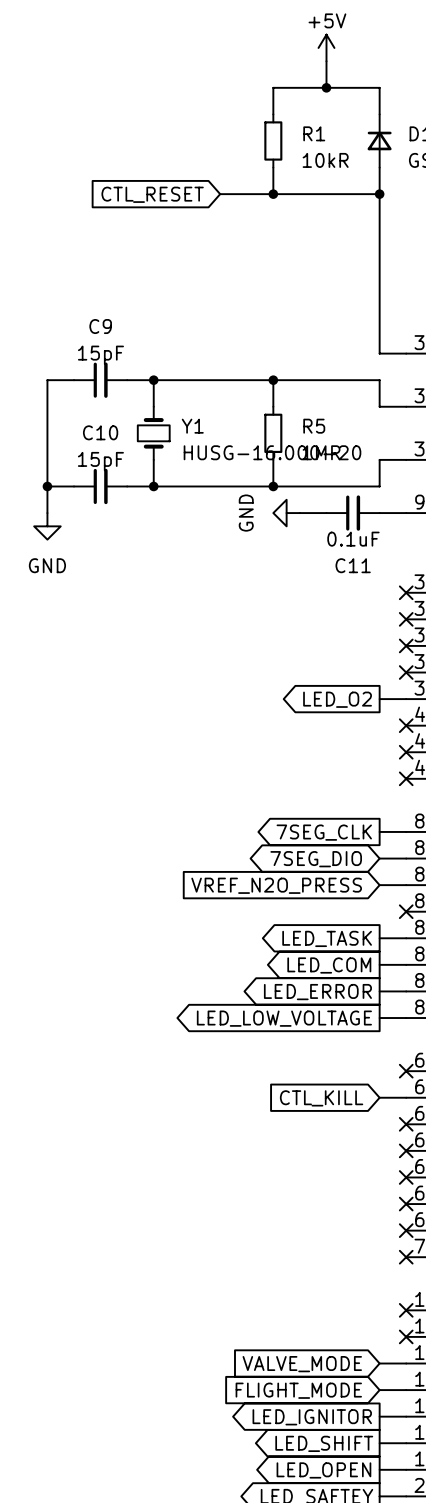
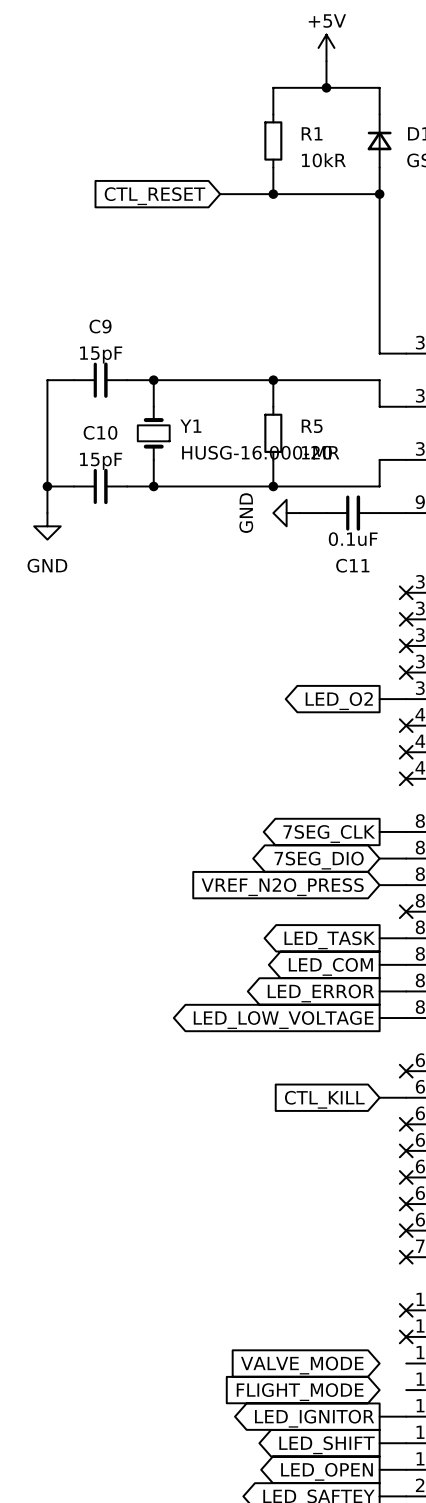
wire: (379, 1363) (406, 1363) -> none
wire: (379, 1390) (406, 1390) -> none

